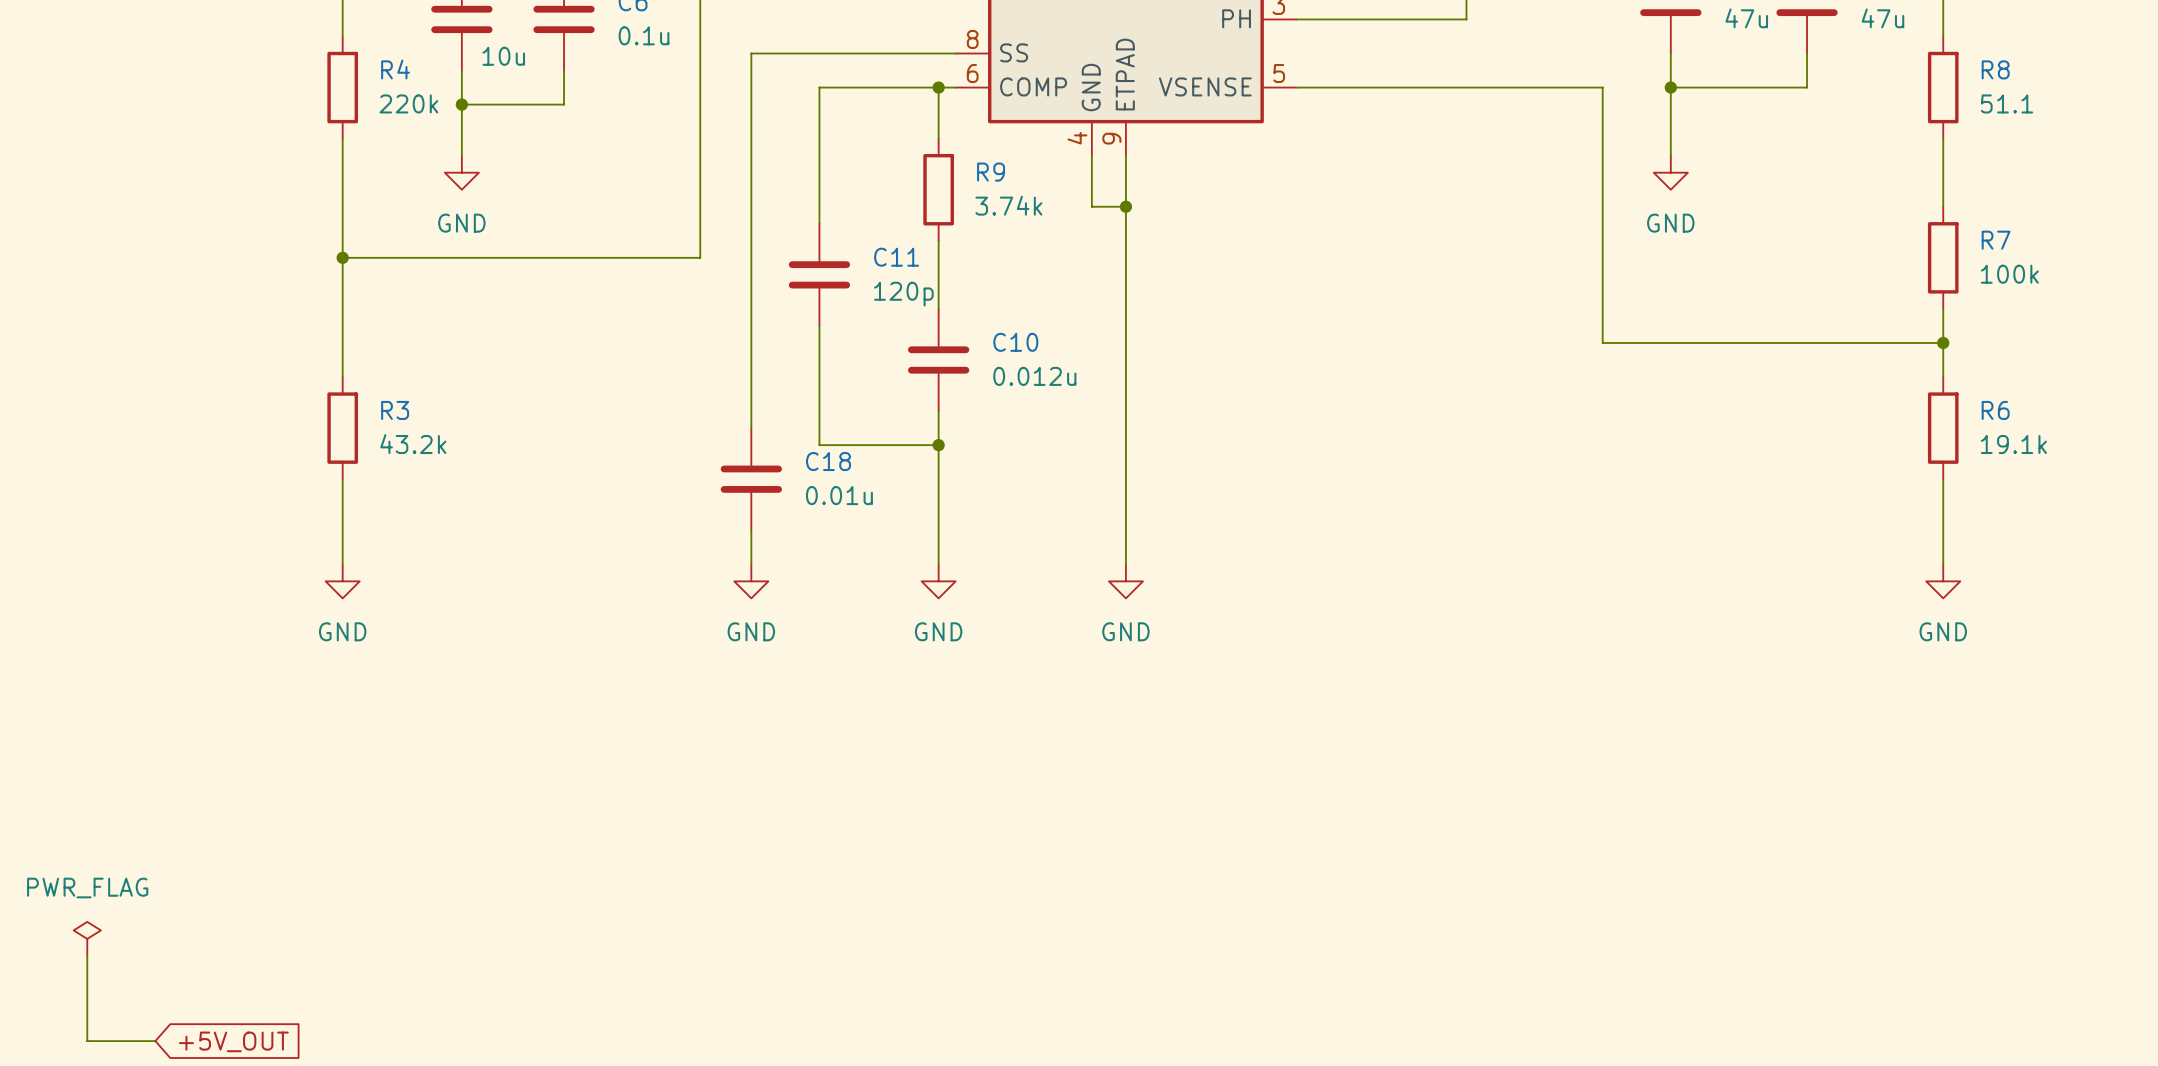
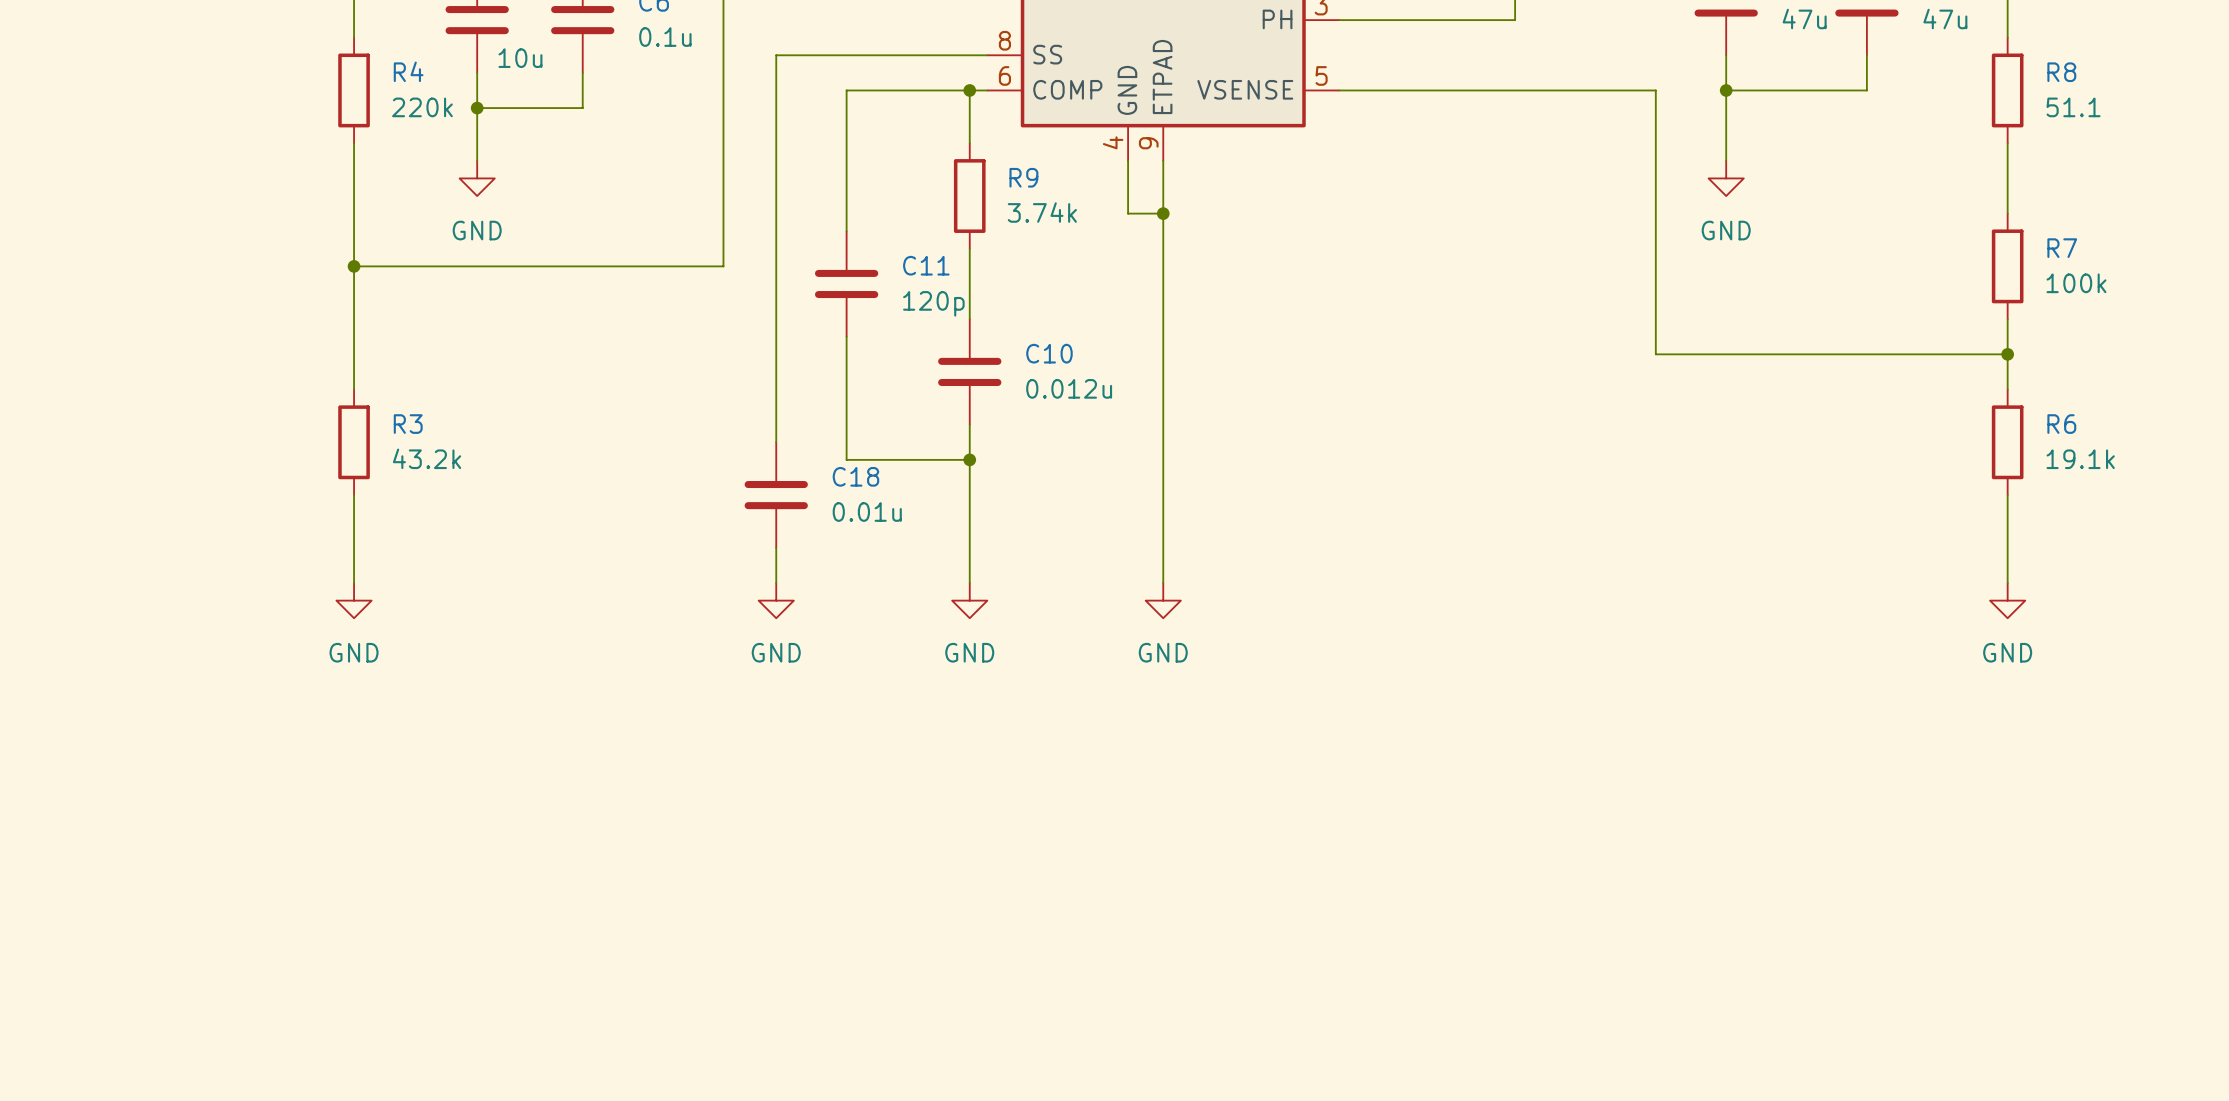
power symbol: PWR_FLAG (87, 938) -> none
wire: (87, 955) (87, 1041) (155, 1041) -> none
global label: +5V_OUT (233, 1041) -> none

